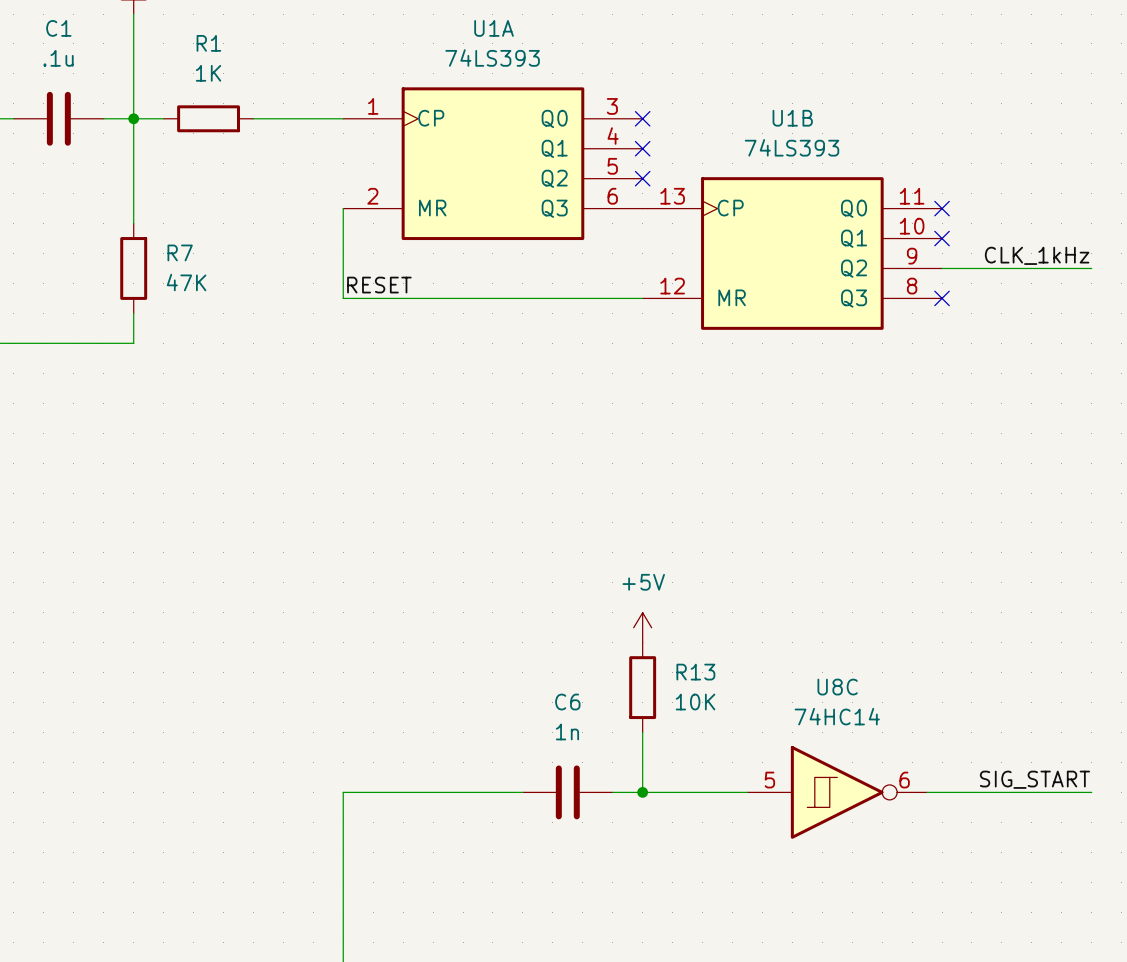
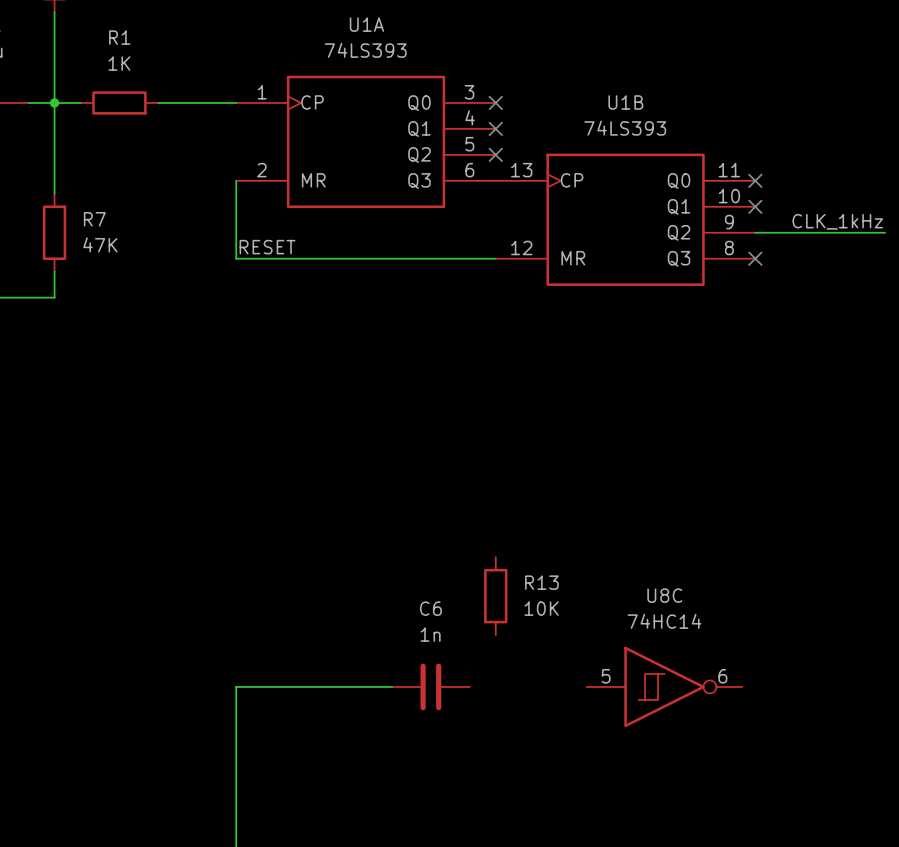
power symbol: +5V (642, 627) -> none
wire: (642, 732) (642, 792) -> none
label: SIG_START (1034, 779) -> none
wire: (612, 792) (747, 792) -> none
junction: (642, 792) -> none
wire: (927, 792) (1091, 792) -> none

